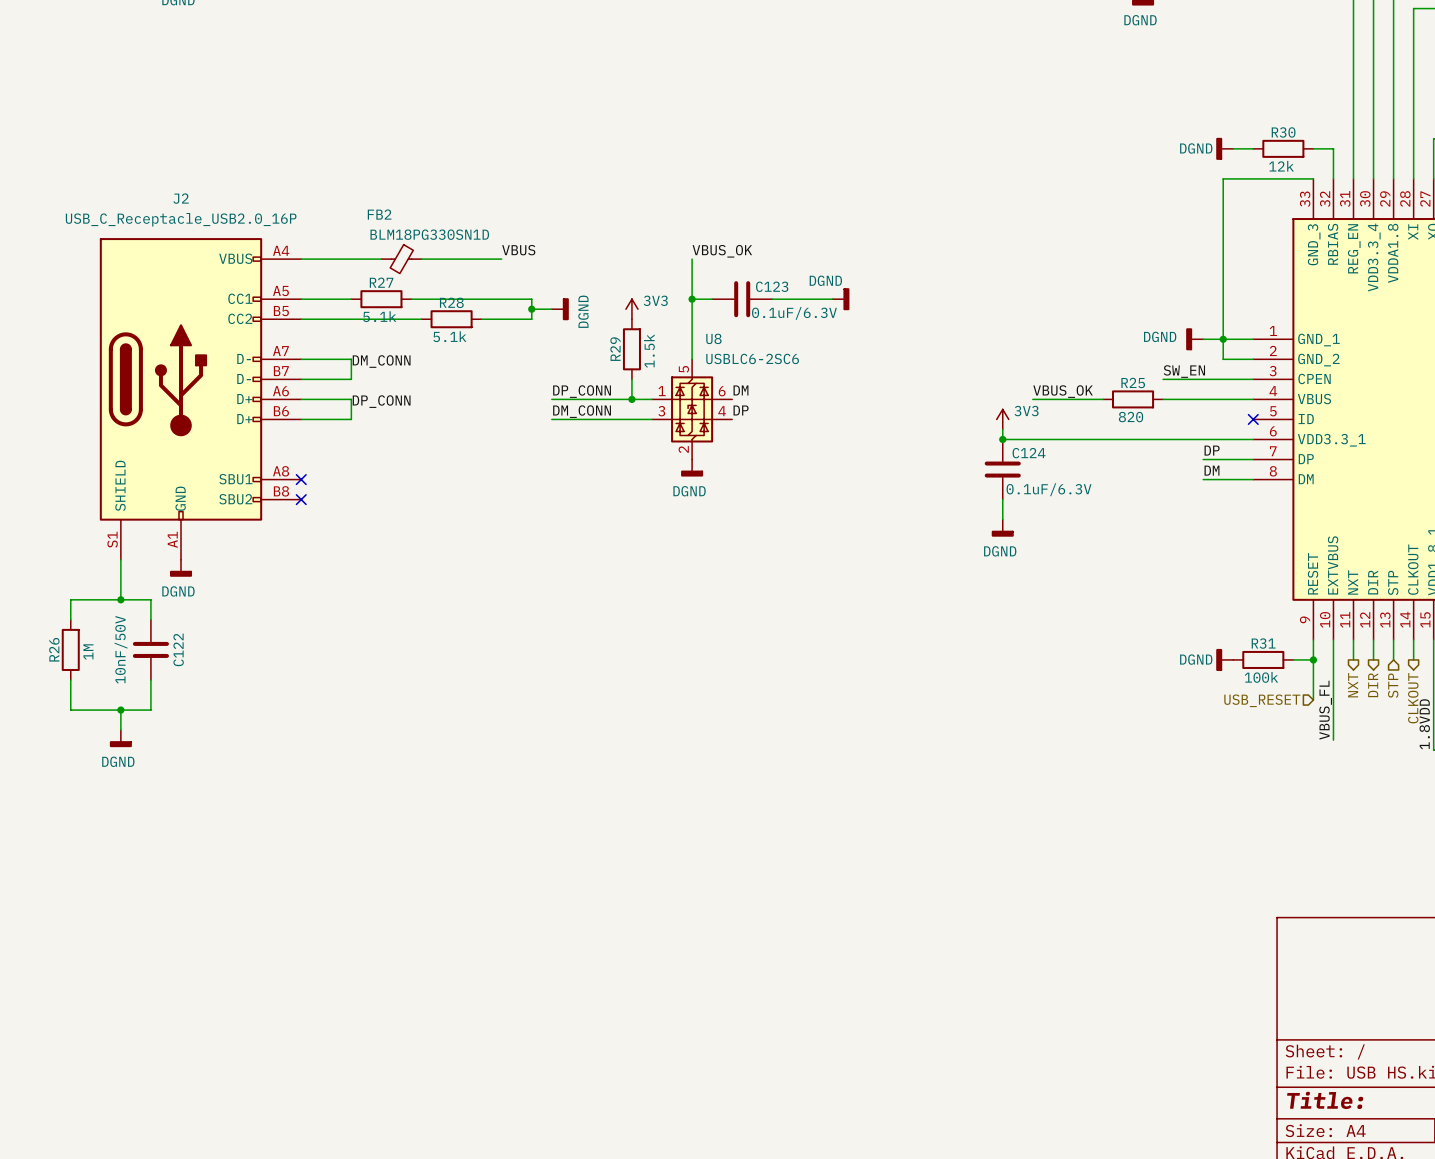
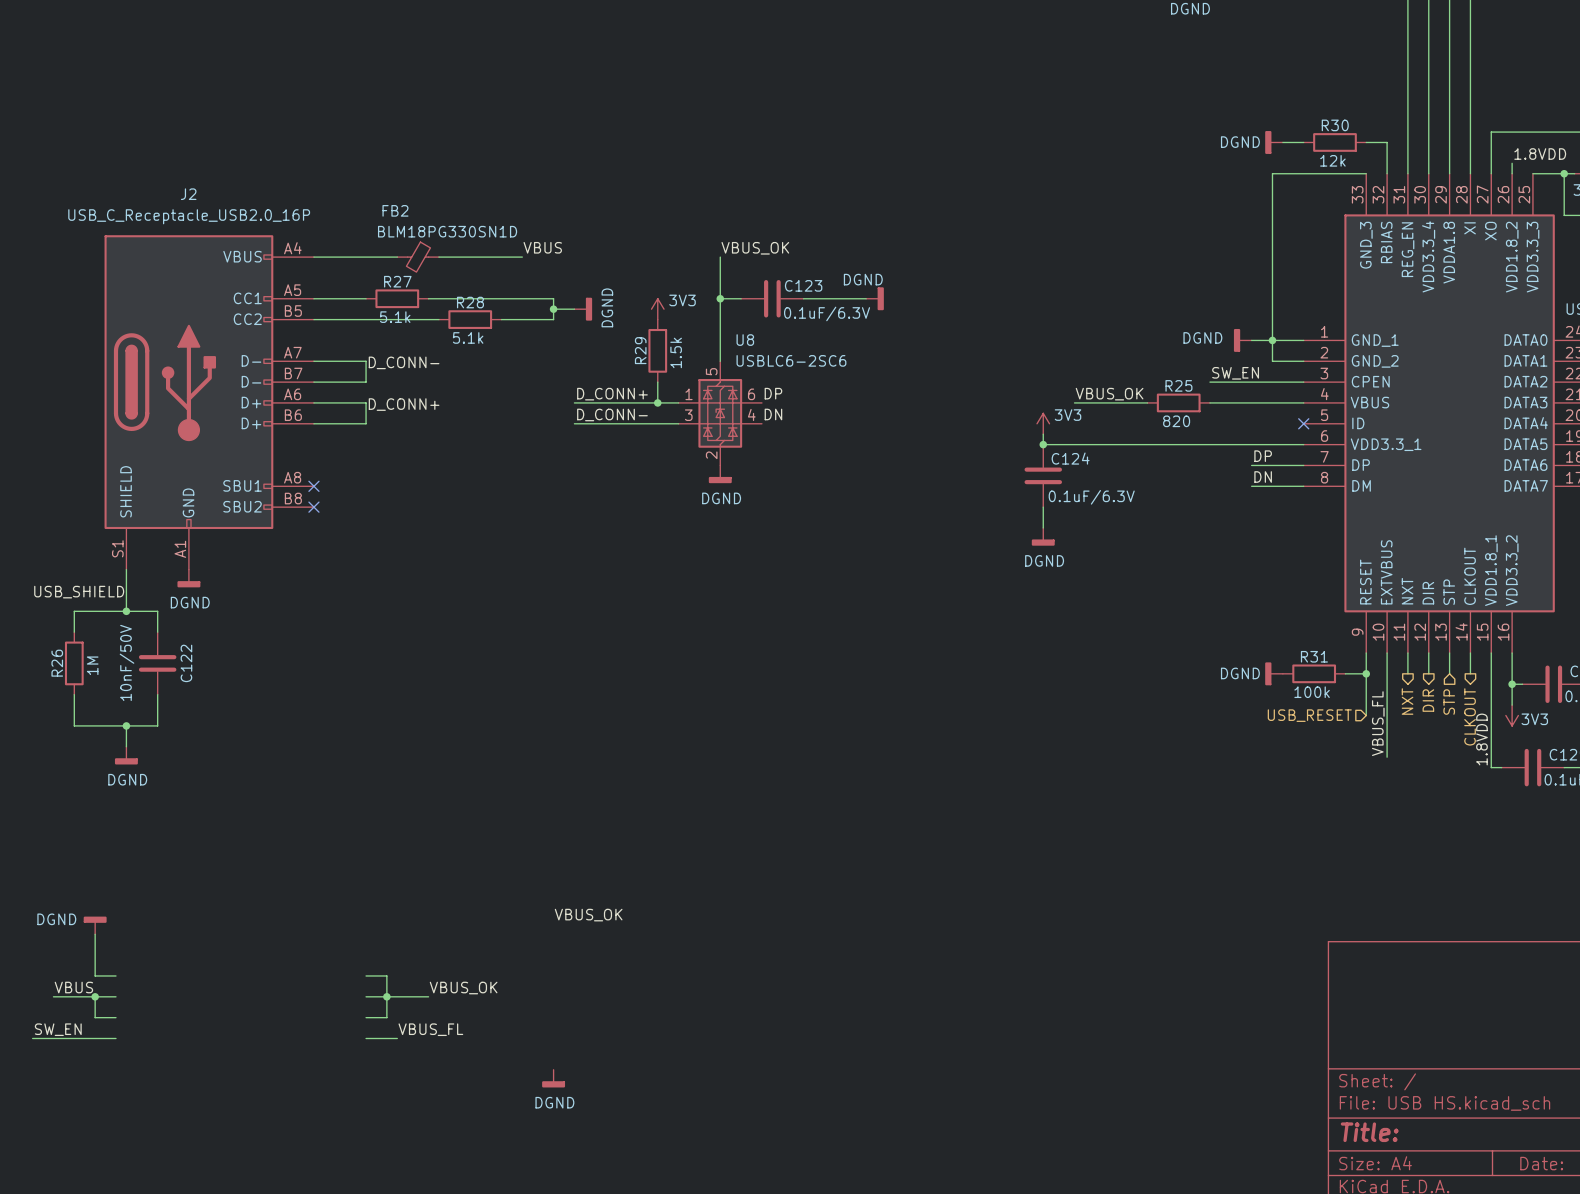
label: DM_CONN (381, 361) -> D_CONN- (404, 362)
label: DM (740, 390) -> DP (773, 393)
label: DP_CONN (582, 391) -> D_CONN+ (612, 394)
label: DP_CONN (381, 401) -> D_CONN+ (404, 404)
label: DP (741, 410) -> DN (773, 414)
label: DM_CONN (582, 411) -> D_CONN- (612, 414)
label: DM (1211, 470) -> DN (1263, 477)
label: none -> USB_SHIELD (79, 592)
label: none -> VBUS_OK (588, 915)
power symbol: none -> DGND (95, 925)
wire: none -> (95, 934) (95, 975) (115, 975)
wire: none -> (366, 975) (386, 975) (386, 1017) (366, 1017)
label: none -> VBUS (73, 987)
label: none -> VBUS_OK (463, 988)
wire: none -> (53, 996) (115, 996)
wire: none -> (95, 996) (95, 1017) (115, 1017)
junction: none -> (95, 996)
wire: none -> (366, 996) (428, 996)
junction: none -> (386, 996)
label: none -> SW_EN (58, 1029)
label: none -> VBUS_FL (430, 1029)
wire: none -> (32, 1038) (115, 1038)
wire: none -> (366, 1038) (397, 1038)
power symbol: none -> DGND (553, 1078)

